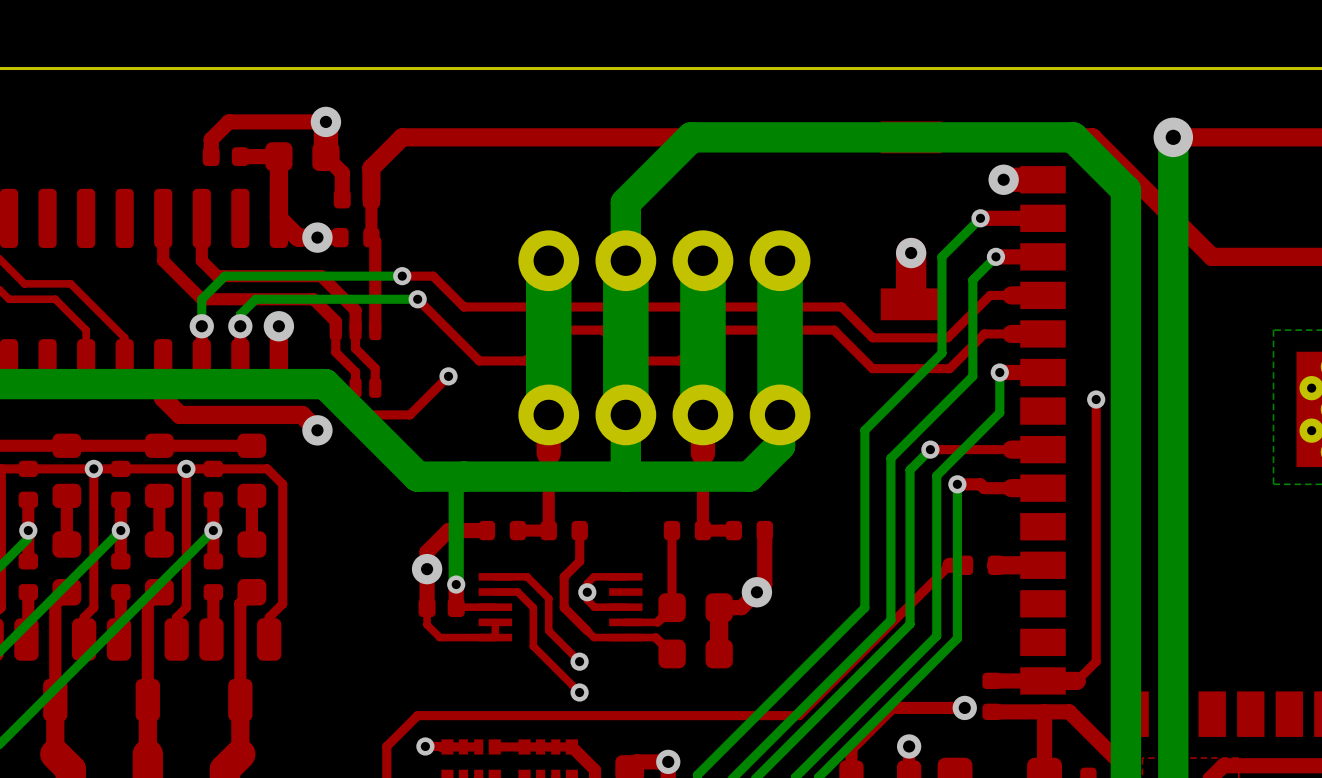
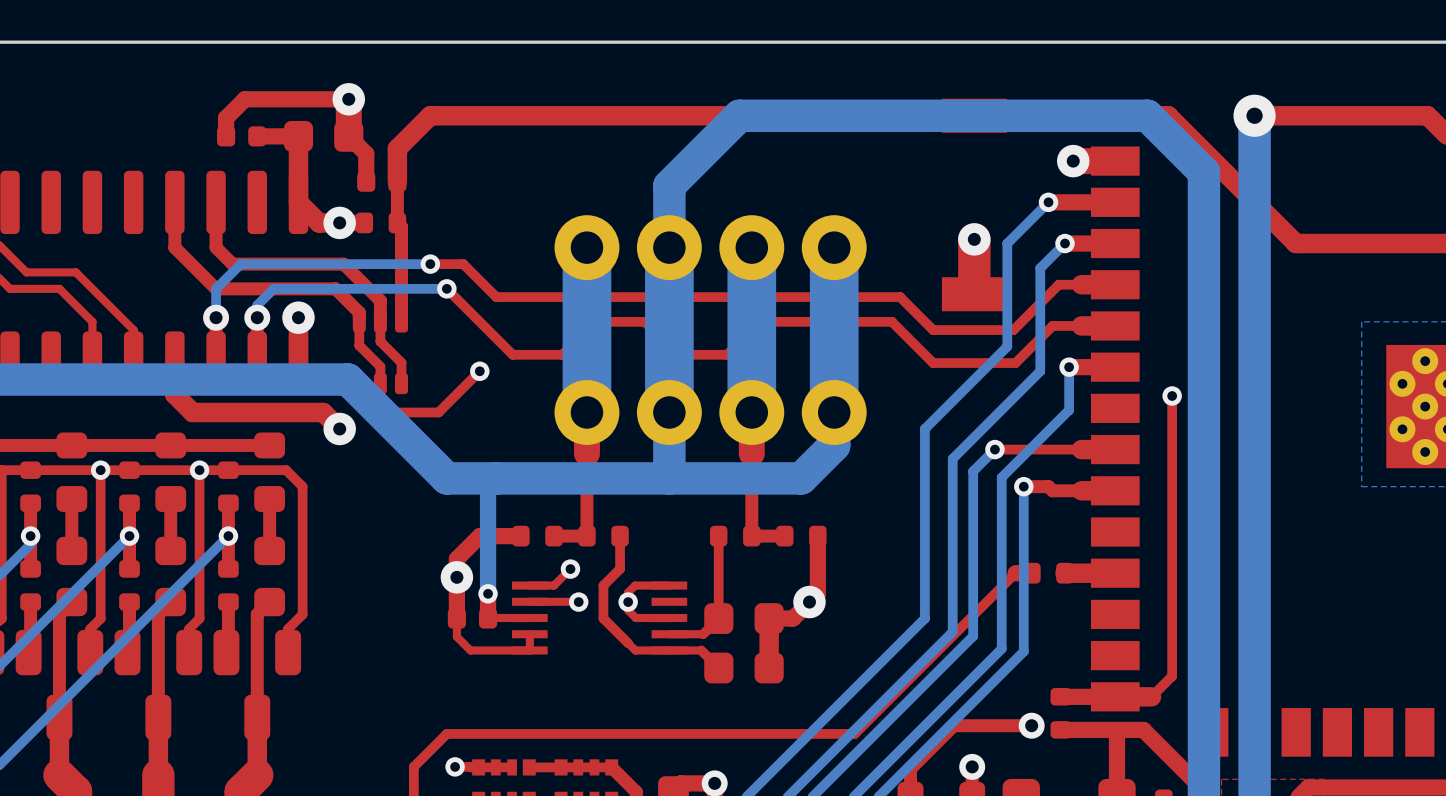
via: none -> (570, 569)
top track: (517, 576) (527, 576) (548, 598) (548, 630) (579, 661) -> (553, 585) (570, 569)
top track: (517, 592) (533, 607) (533, 646) (579, 692) -> (553, 601) (578, 601)
via: none -> (578, 602)
via: (579, 661) -> none
via: (579, 692) -> none

